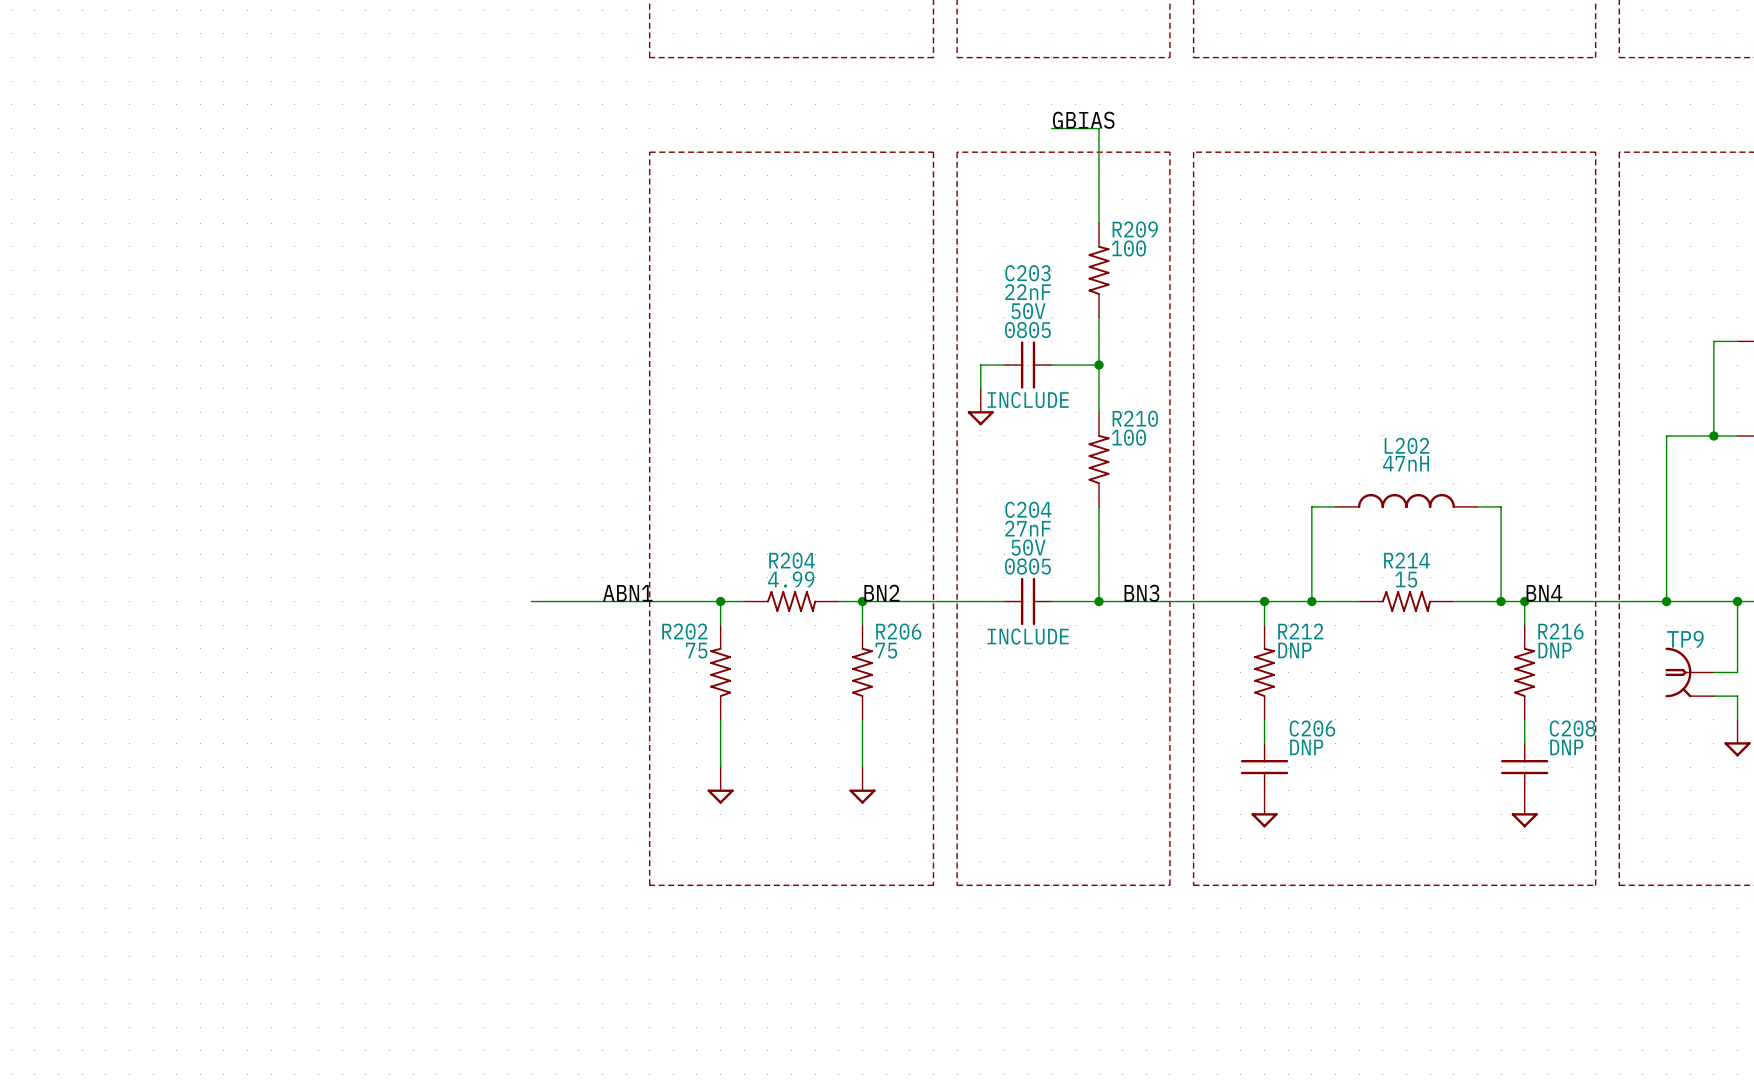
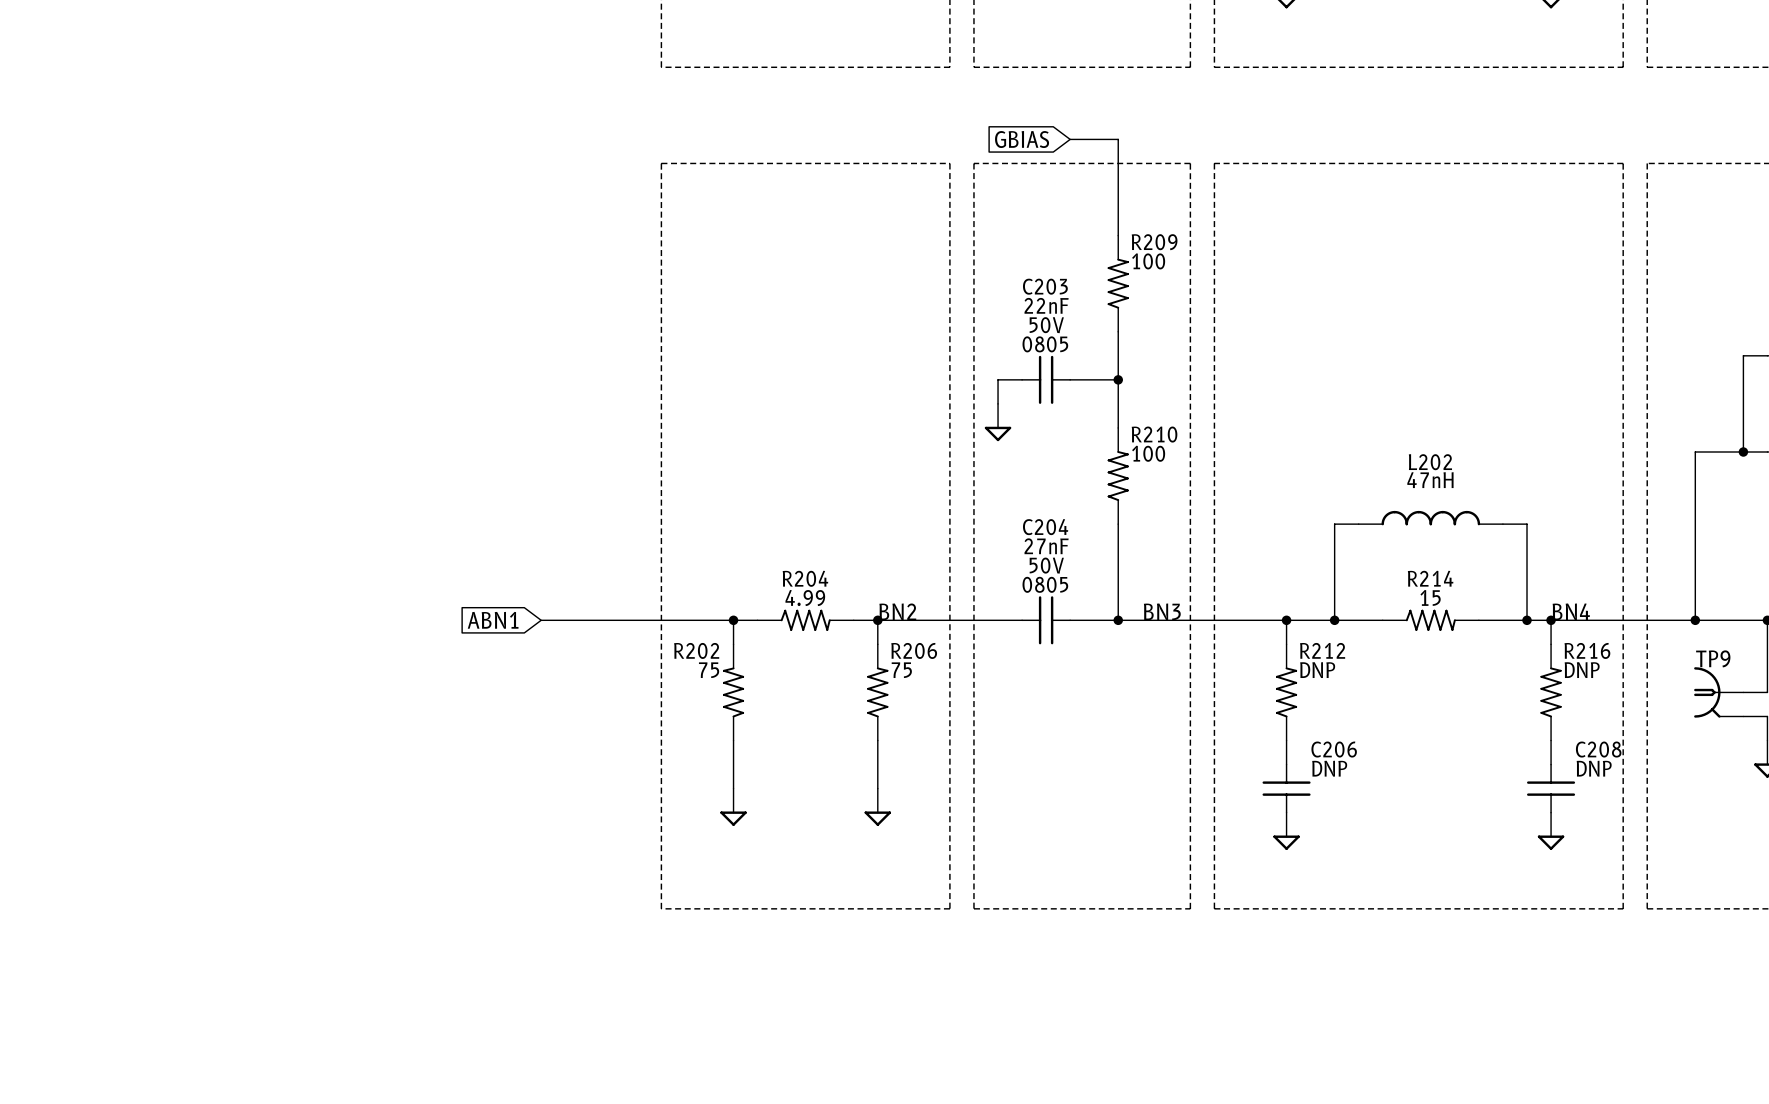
label: GBIAS (1083, 120) -> none
global label: none -> GBIAS (1022, 139)
C203 text: INCLUDE (1028, 400) -> none
label: ABN1 (627, 593) -> none
global label: none -> ABN1 (493, 620)
C204 text: INCLUDE (1028, 636) -> none

